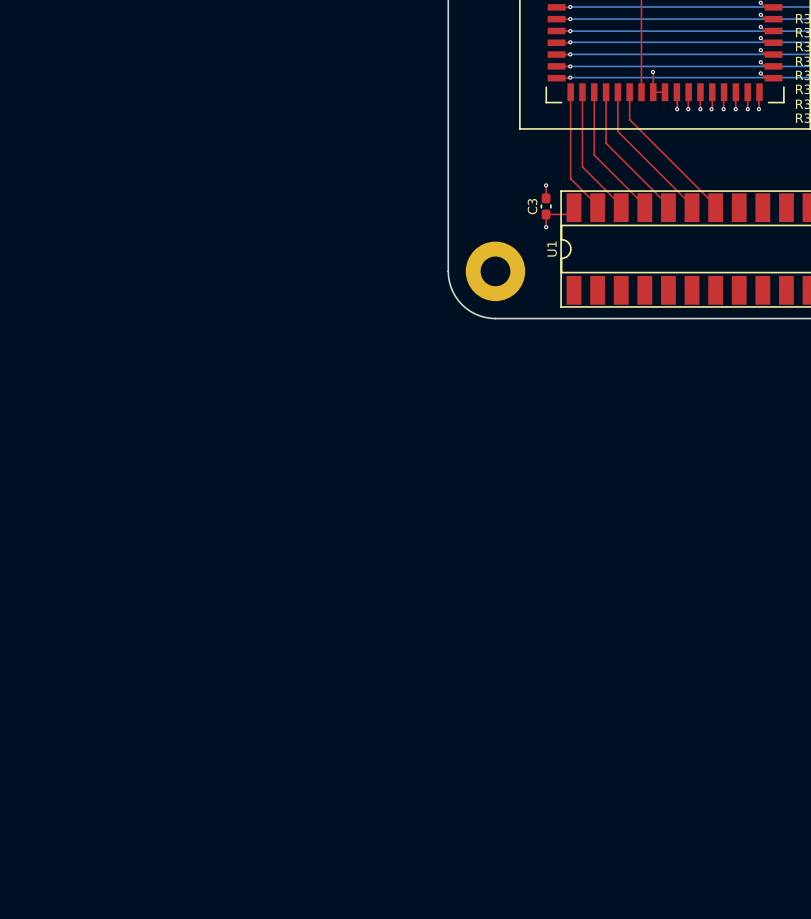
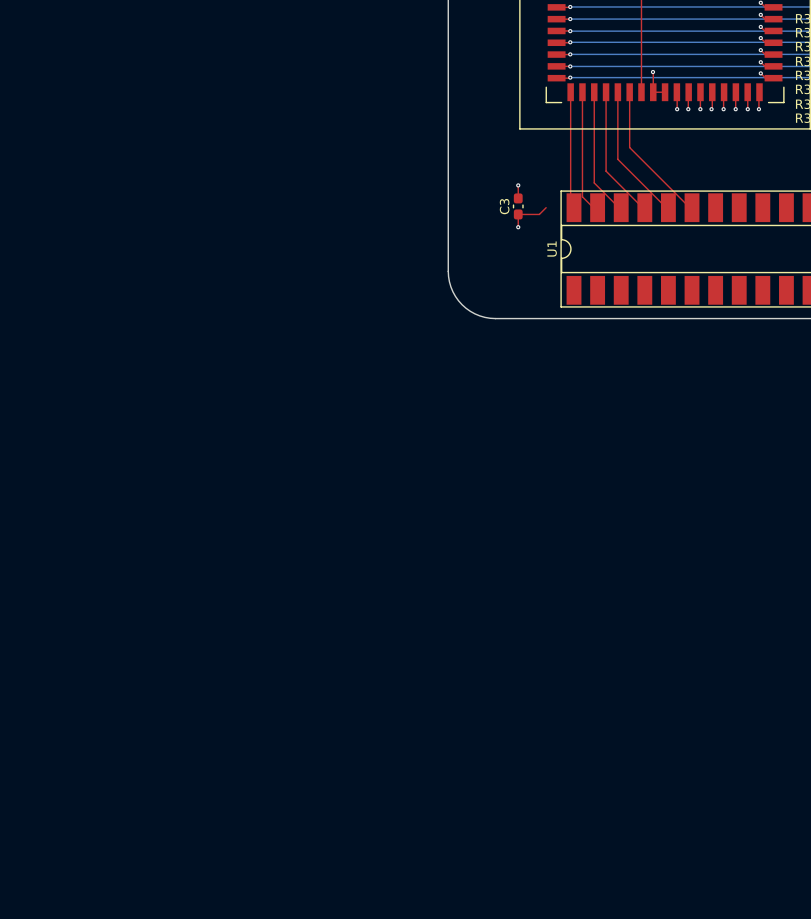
top track: (629, 119) (715, 207) -> (629, 119) (629, 147) (687, 207)
top track: (617, 131) (692, 207) -> (617, 131) (617, 159) (664, 207)
top track: (606, 143) (668, 207) -> (606, 143) (606, 171) (640, 207)
top track: (594, 155) (644, 207) -> (594, 155) (594, 182) (616, 207)
top track: (582, 166) (621, 207) -> (582, 166) (582, 196) (593, 207)
top track: (570, 178) (597, 207) -> (570, 178) (569, 207)
via: none -> (518, 185)
top track: (546, 185) (546, 198) -> (518, 185) (518, 198)
via: (546, 185) -> none
C3 position: (546, 206) -> (518, 206)
top track: (574, 207) (567, 214) (546, 214) (546, 227) -> (546, 207) (539, 214) (518, 214) (518, 227)
via: none -> (518, 227)
via: (546, 227) -> none
part: (495, 271) -> none

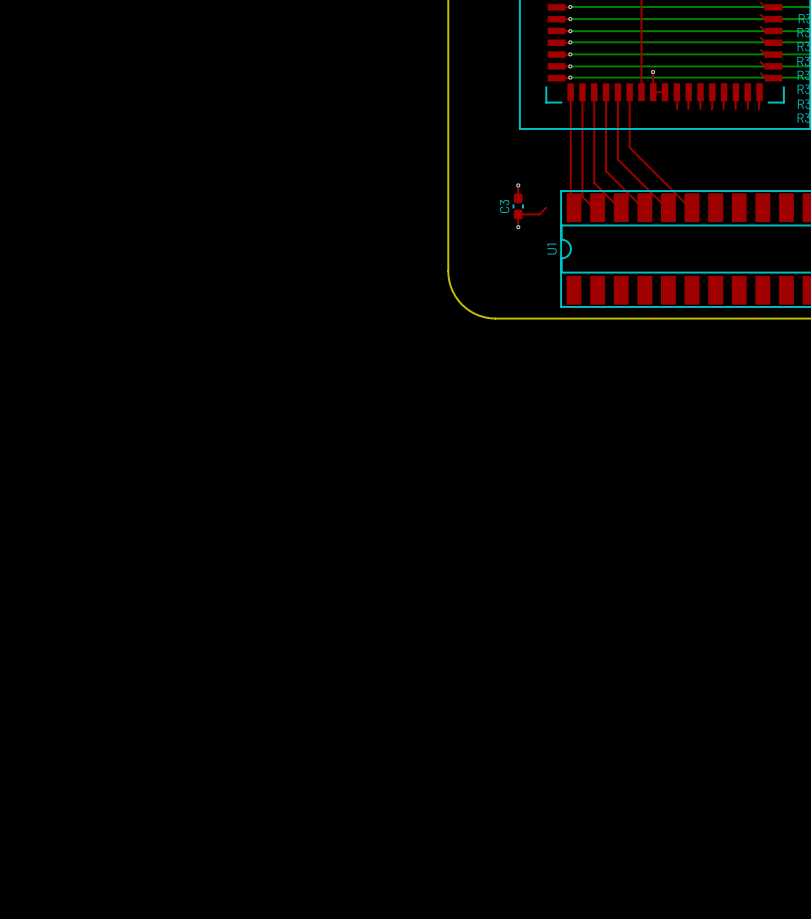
via: (760, 2) -> none
via: (760, 14) -> none
via: (760, 26) -> none
via: (760, 38) -> none
via: (760, 50) -> none
via: (760, 62) -> none
via: (760, 73) -> none
via: (677, 109) -> none
via: (688, 109) -> none
via: (700, 109) -> none
via: (711, 109) -> none
via: (723, 109) -> none
via: (735, 109) -> none
via: (747, 109) -> none
via: (758, 109) -> none

